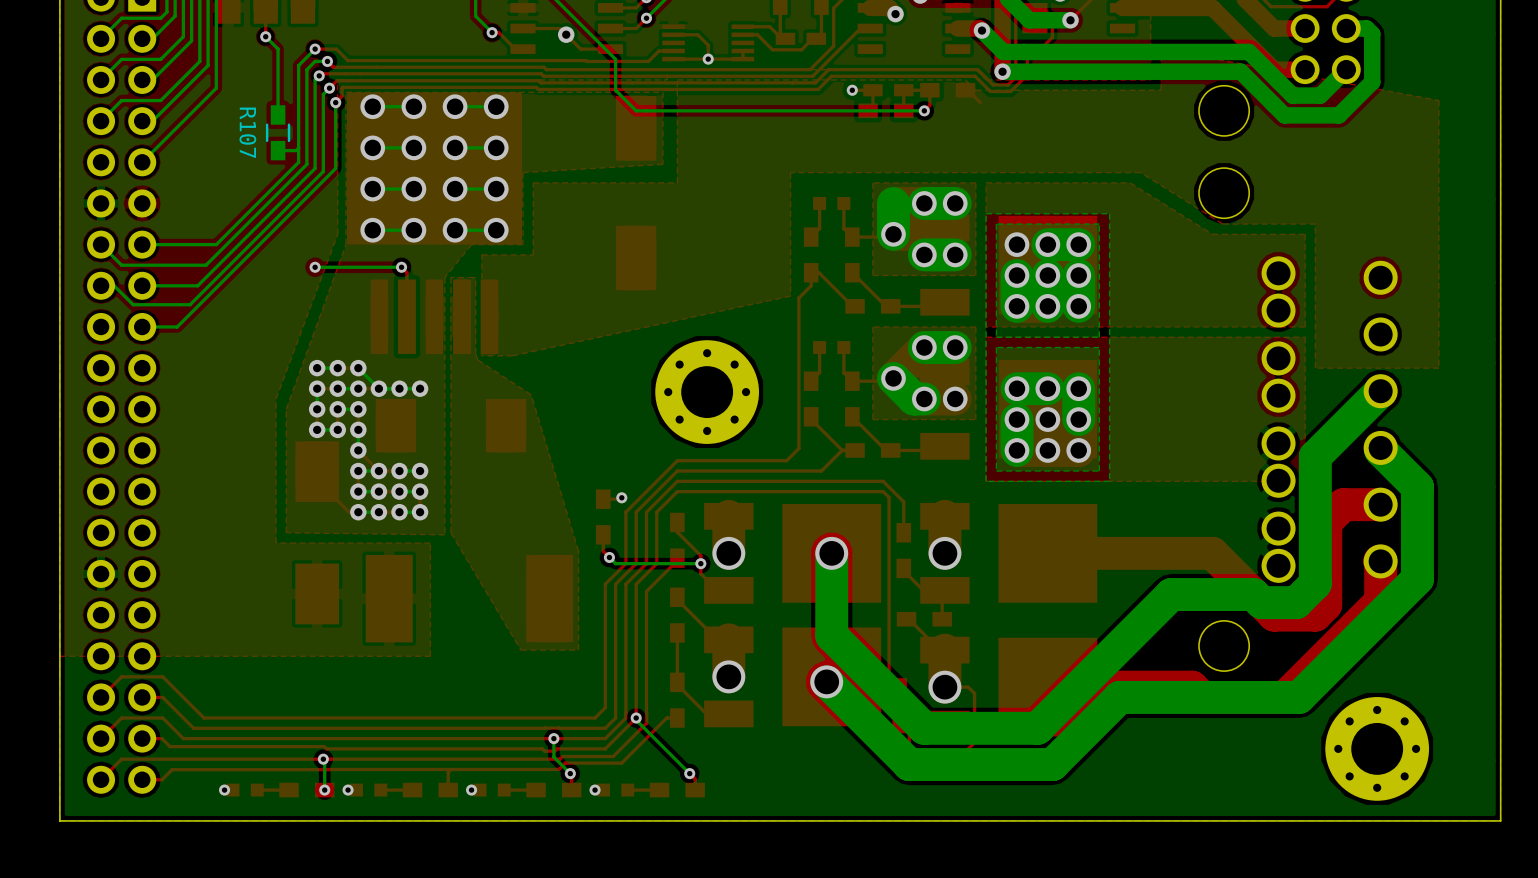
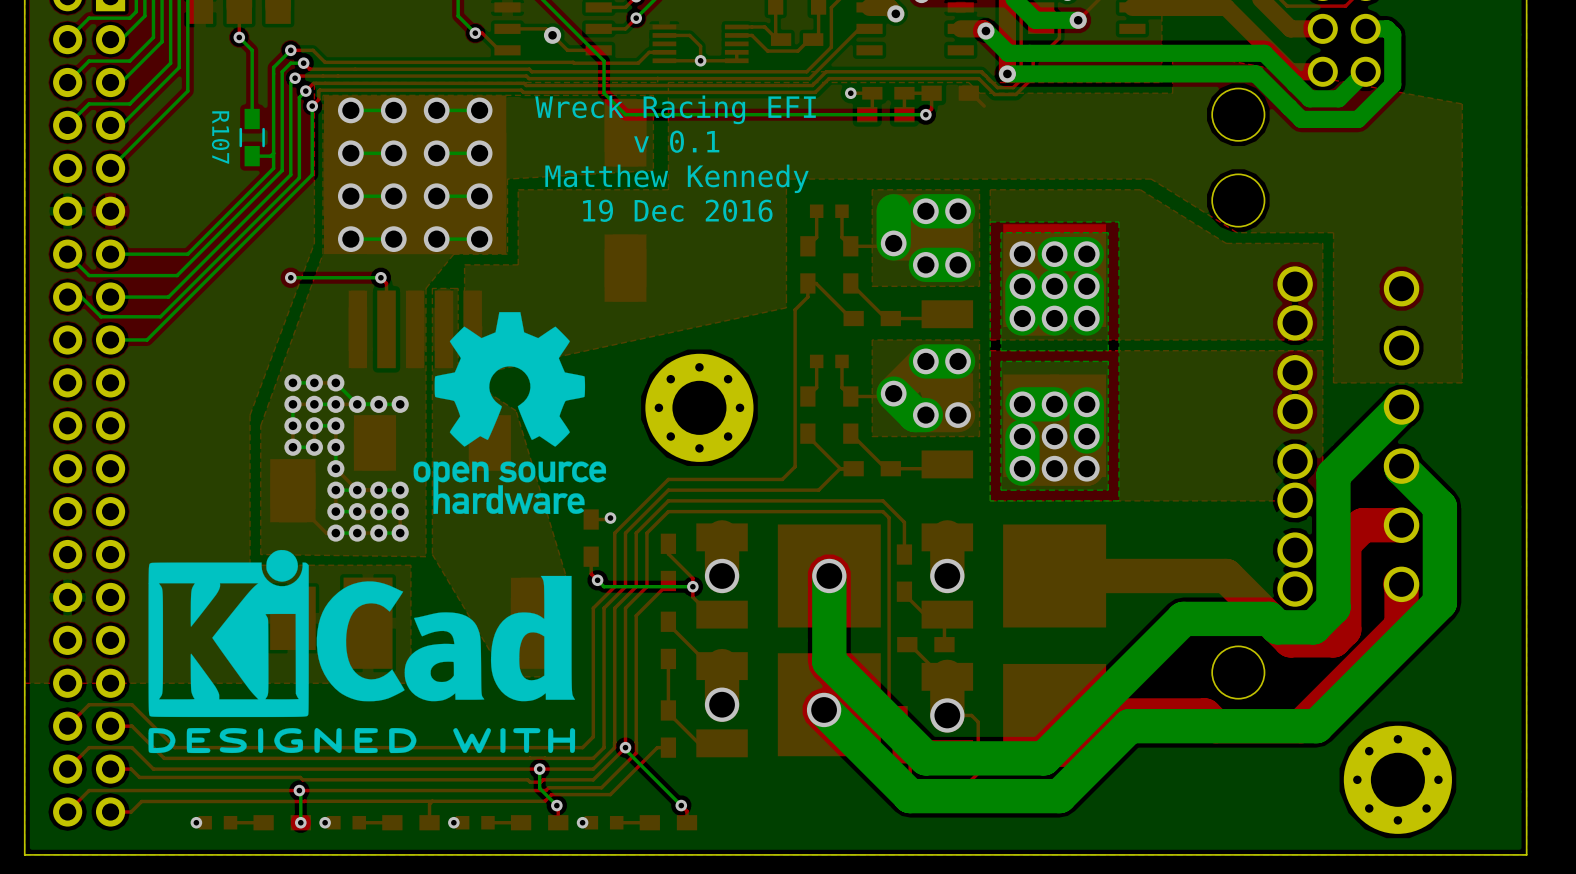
text: none -> Wreck Racing EFI (675, 109)
text: none -> v 0.1 (676, 141)
text: none -> Matthew Kennedy (677, 178)
text: none -> 19 Dec 2016 (677, 210)
drawing: none -> [413, 312, 607, 515]
drawing: none -> [148, 549, 576, 754]

